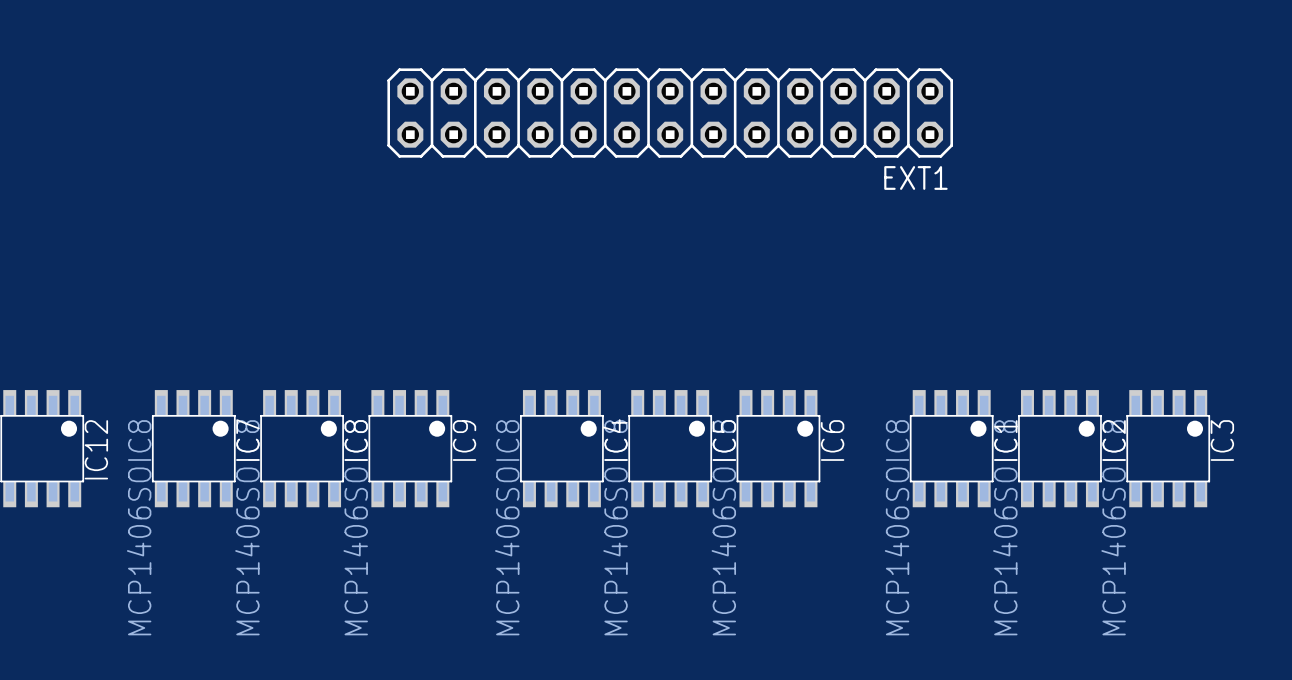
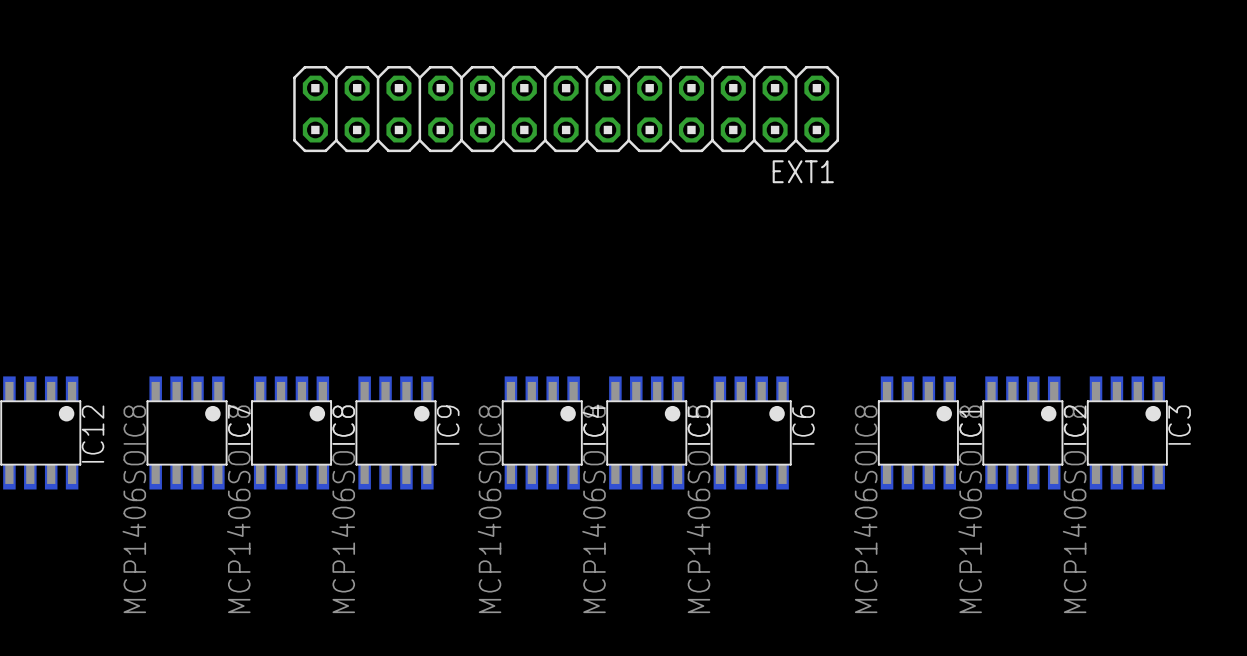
EXT1 position: (670, 113) -> (566, 109)

